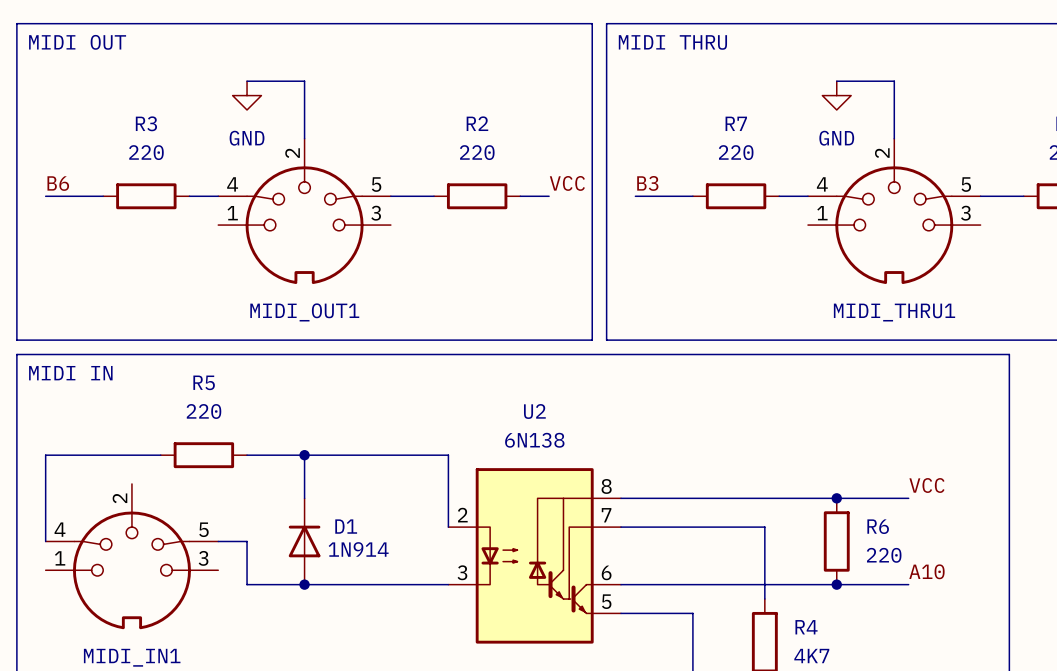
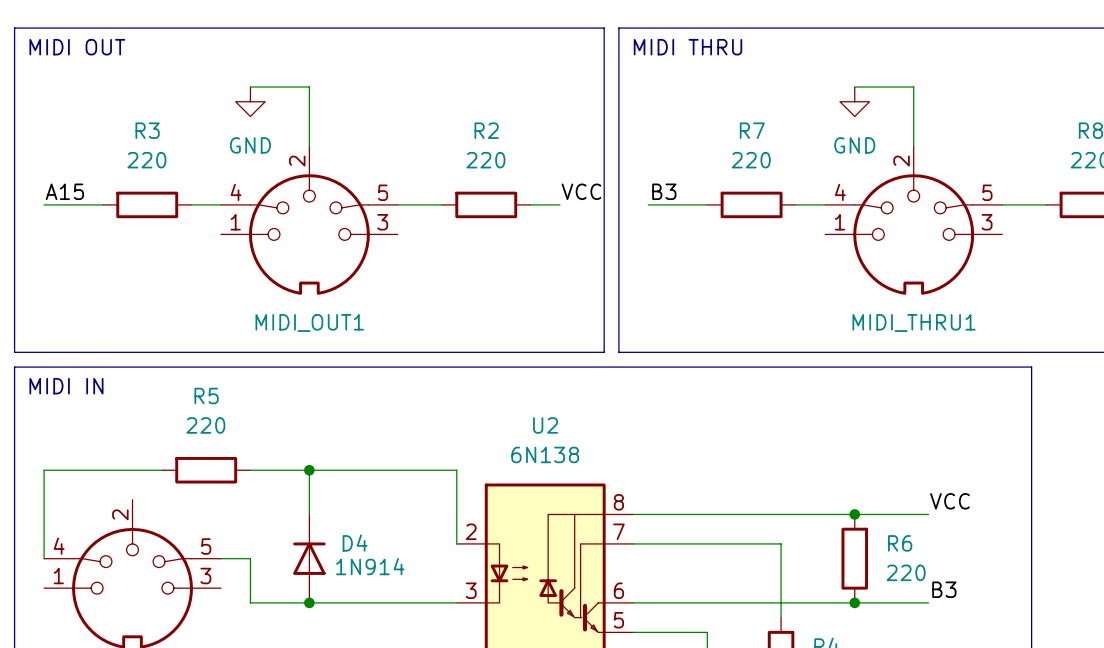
label: B6 (58, 183) -> A15 (64, 191)
D1 name: D1 (346, 526) -> D4 (355, 543)
label: A10 (926, 571) -> B3 (944, 589)

